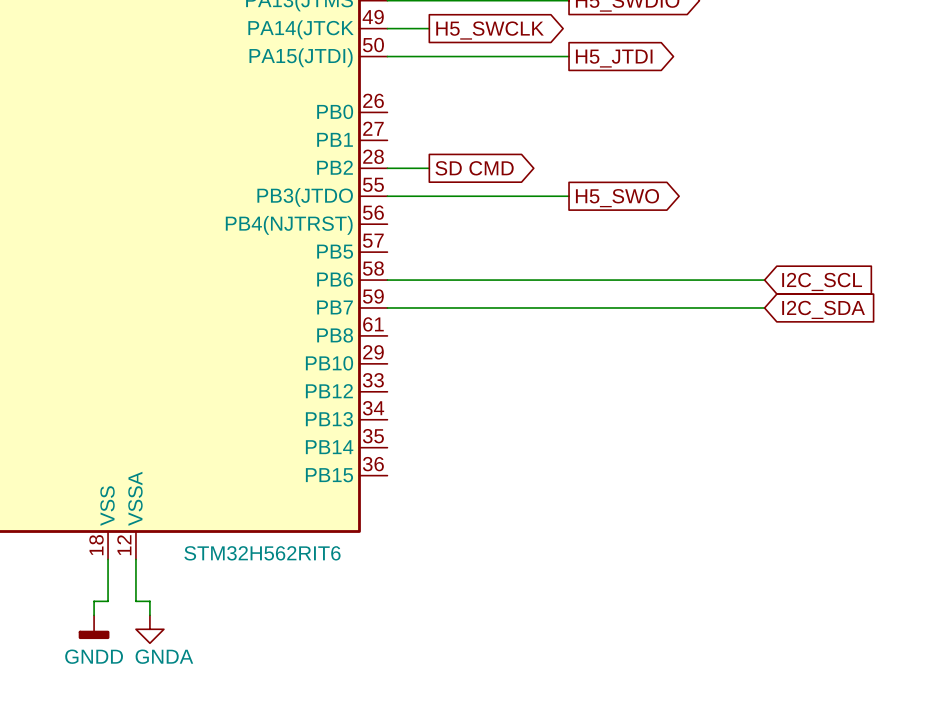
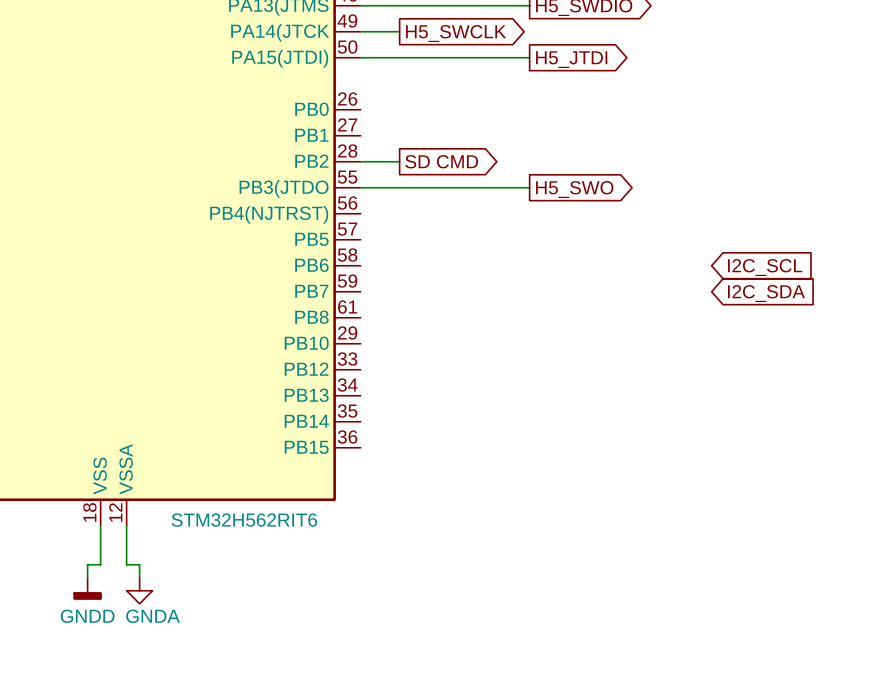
wire: (387, 280) (764, 280) -> none
wire: (387, 307) (764, 307) -> none

